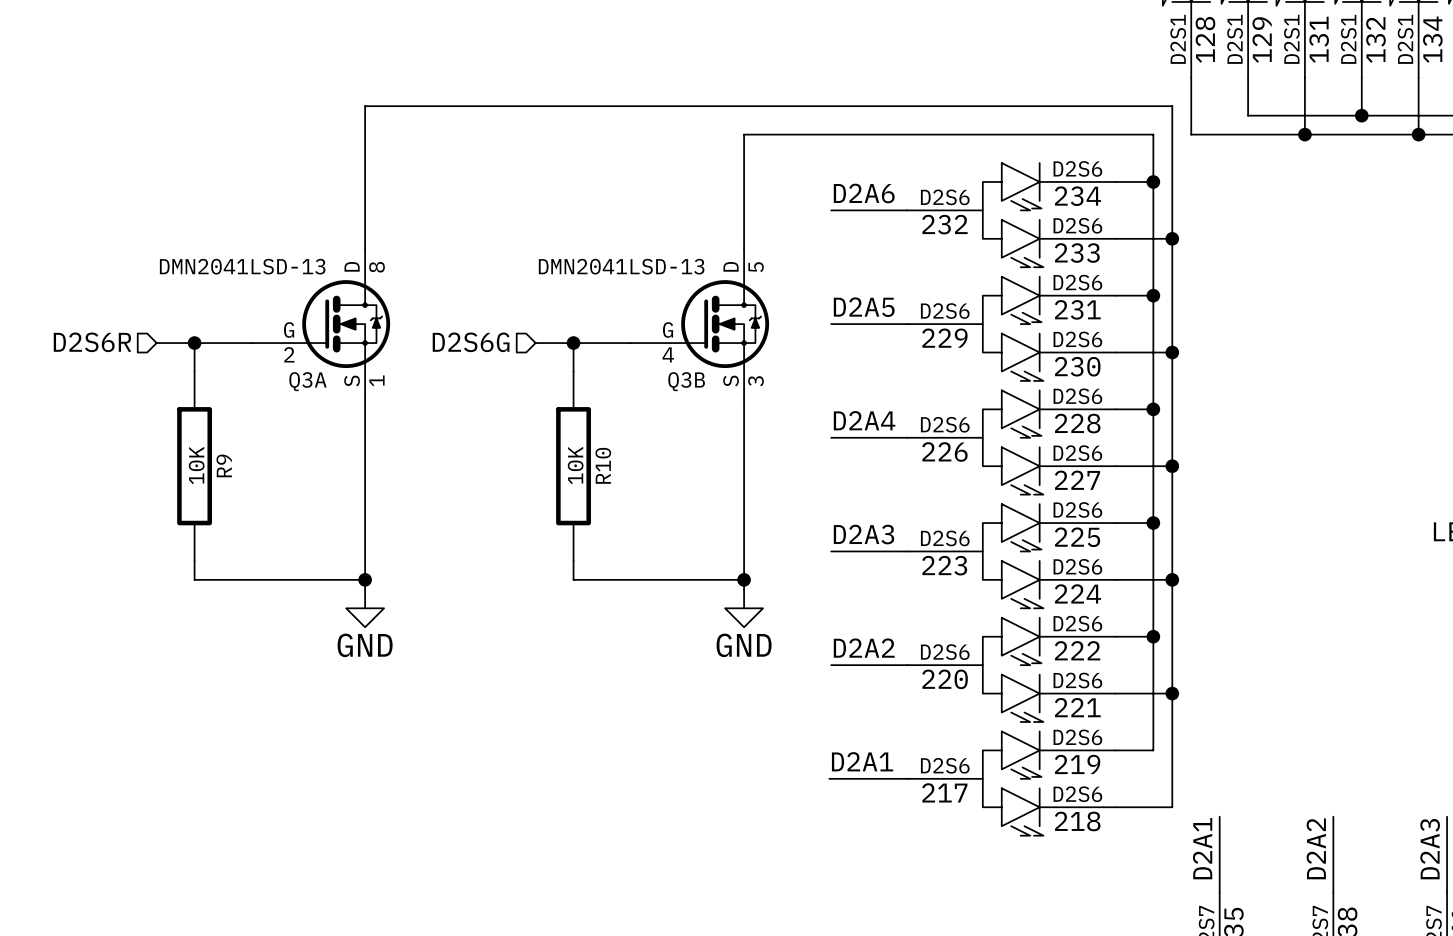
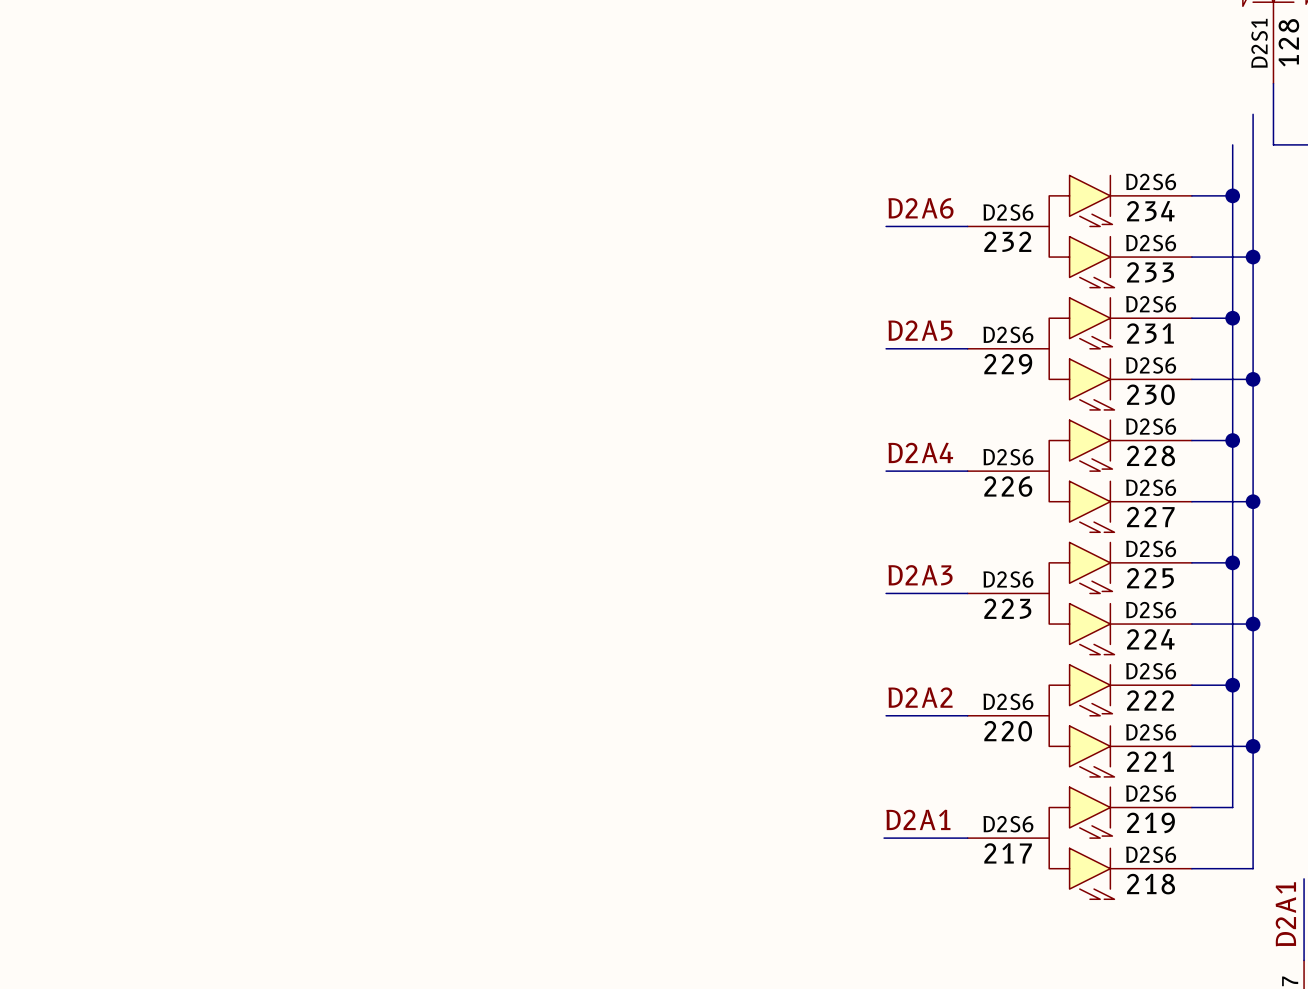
wire: (1172, 106) (365, 106) (365, 248) -> none
wire: (1153, 134) (744, 134) (744, 248) -> none
Q3A: DMN2041LSD-13 (320, 324) -> none
Q3B: DMN2041LSD-13 (699, 324) -> none
hierarchical label: D2S6R (92, 342) -> none
hierarchical label: D2S6G (471, 342) -> none
wire: (156, 343) (251, 343) -> none
wire: (194, 343) (194, 371) -> none
junction: (194, 343) -> none
wire: (535, 343) (630, 343) -> none
wire: (573, 343) (573, 371) -> none
junction: (573, 343) -> none
wire: (365, 399) (365, 589) -> none
wire: (744, 399) (744, 589) -> none
R9: 10K (194, 466) -> none
R10: 10K (573, 466) -> none
wire: (194, 560) (194, 579) (365, 579) -> none
wire: (573, 560) (573, 579) (744, 579) -> none
junction: (365, 579) -> none
junction: (744, 579) -> none
power symbol: GND (365, 608) -> none
power symbol: GND (744, 608) -> none

